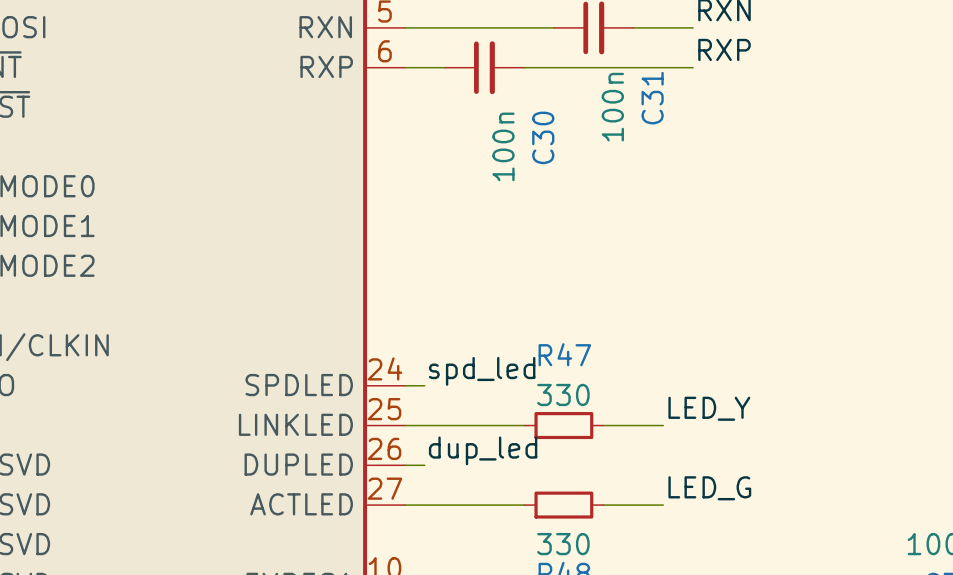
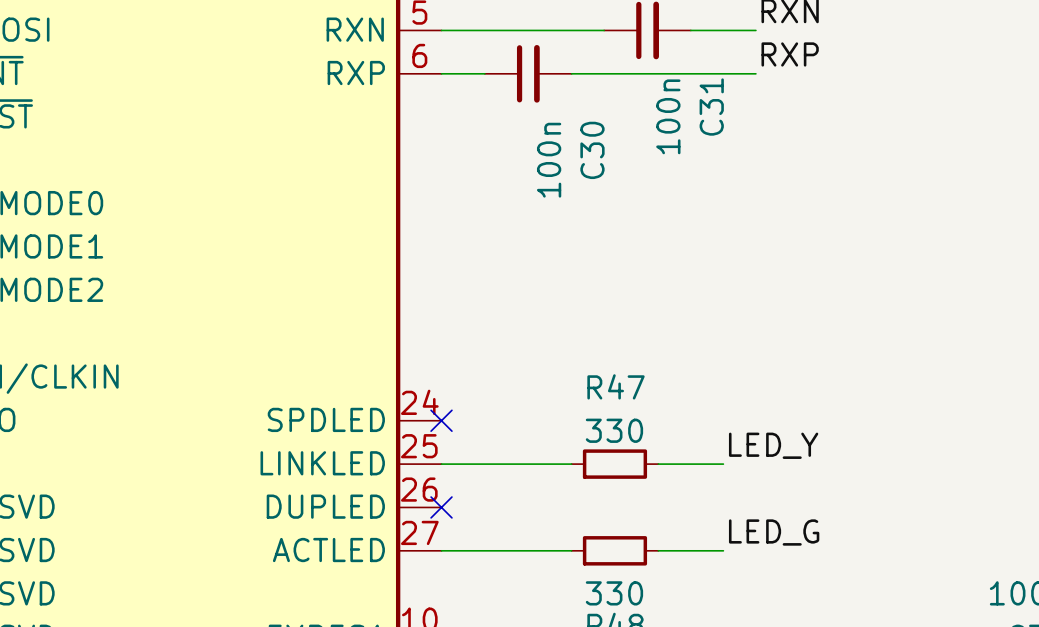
label: spd_led (482, 371) -> none
wire: (404, 385) (424, 385) -> none
no-connect mark: none -> (441, 420)
label: dup_led (483, 450) -> none
wire: (404, 465) (424, 465) -> none
no-connect mark: none -> (441, 507)

